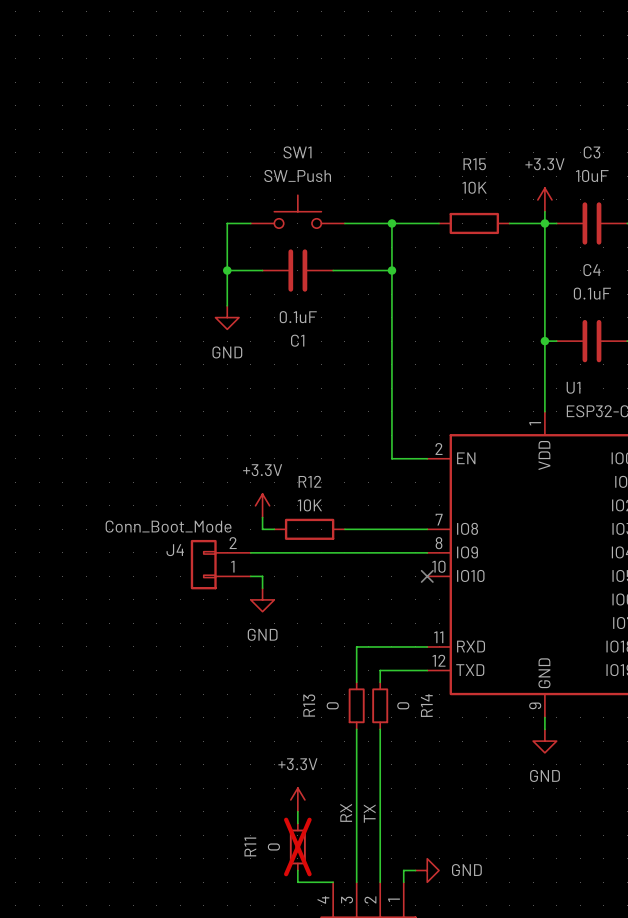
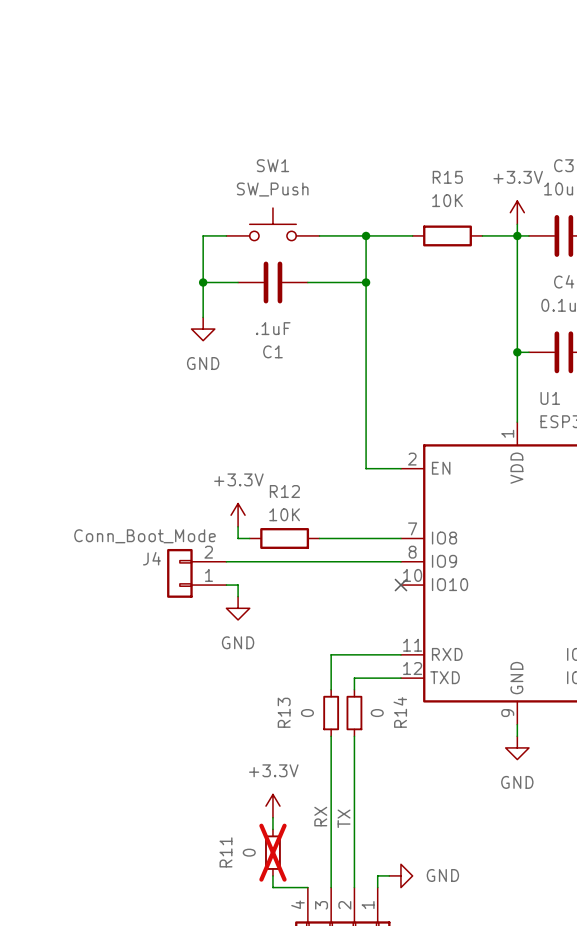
C1 value: 0.1uF (298, 317) -> .1uF (273, 328)

